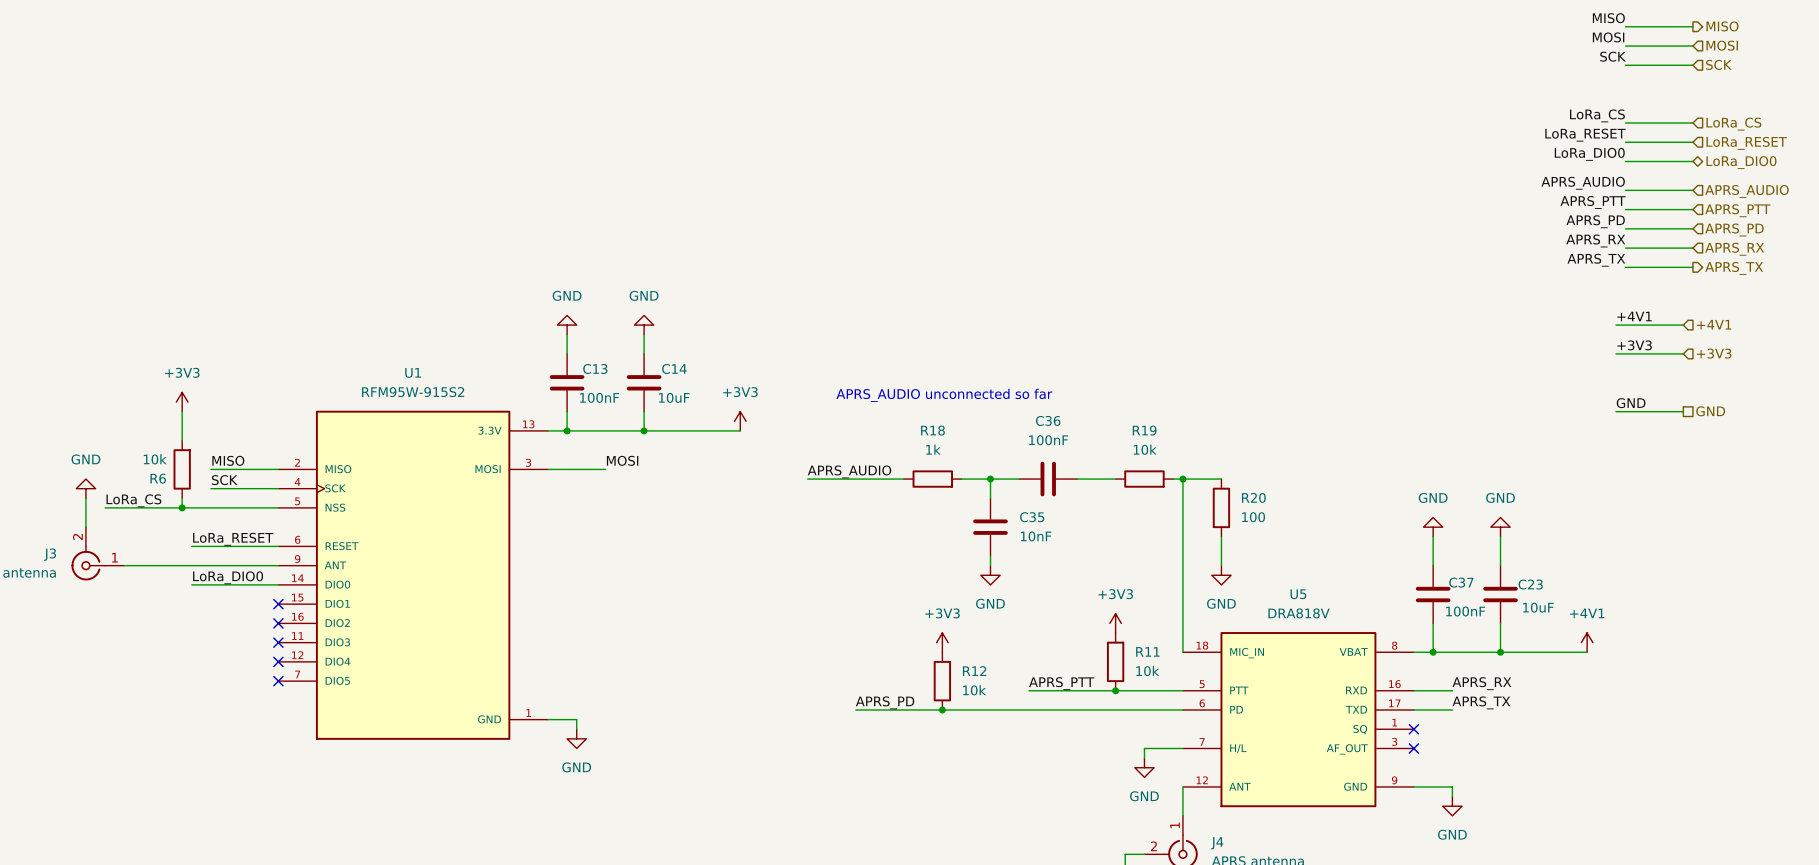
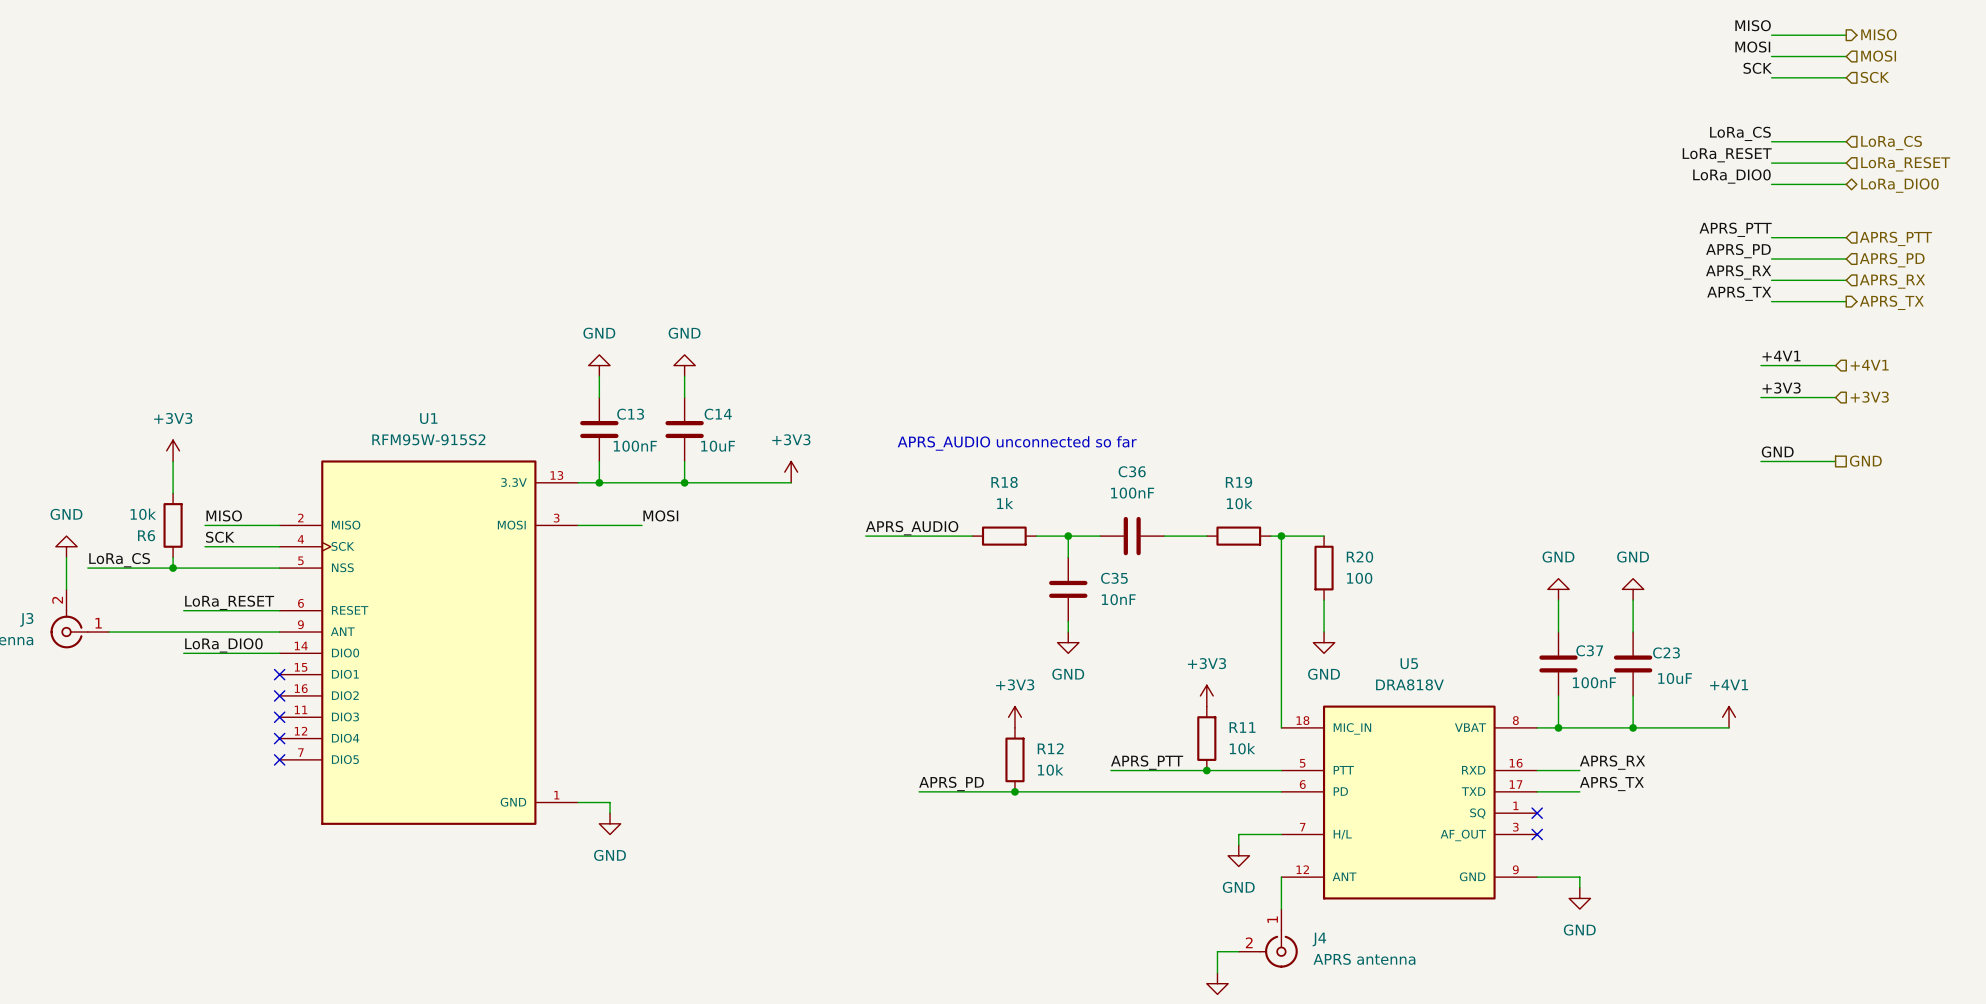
label: APRS_AUDIO (1583, 183) -> none
wire: (1625, 190) (1692, 190) -> none
hierarchical label: APRS_AUDIO (1747, 191) -> none

